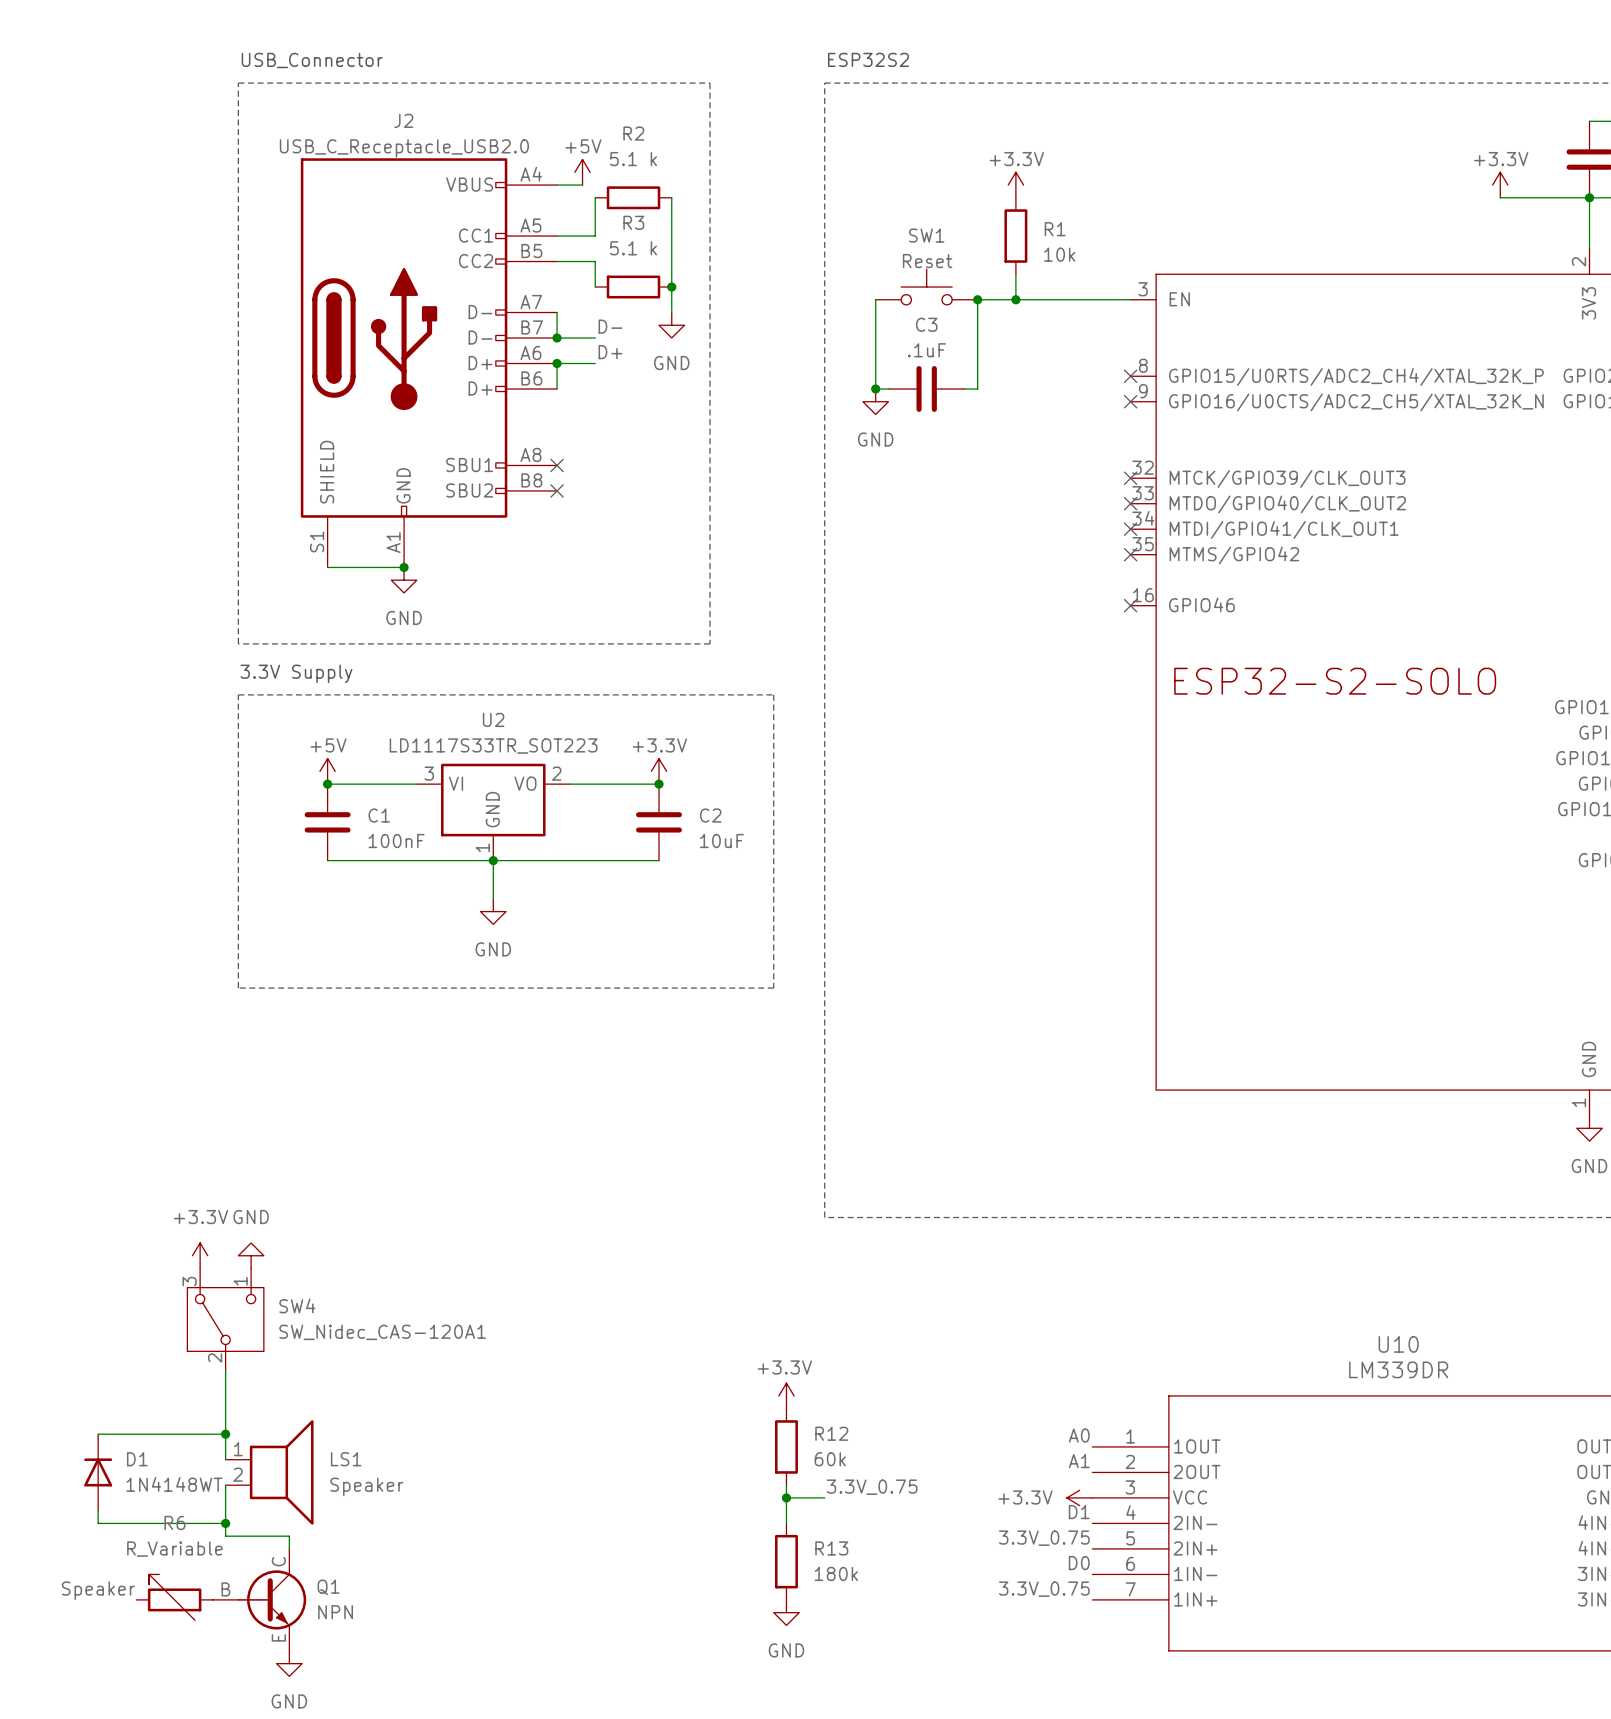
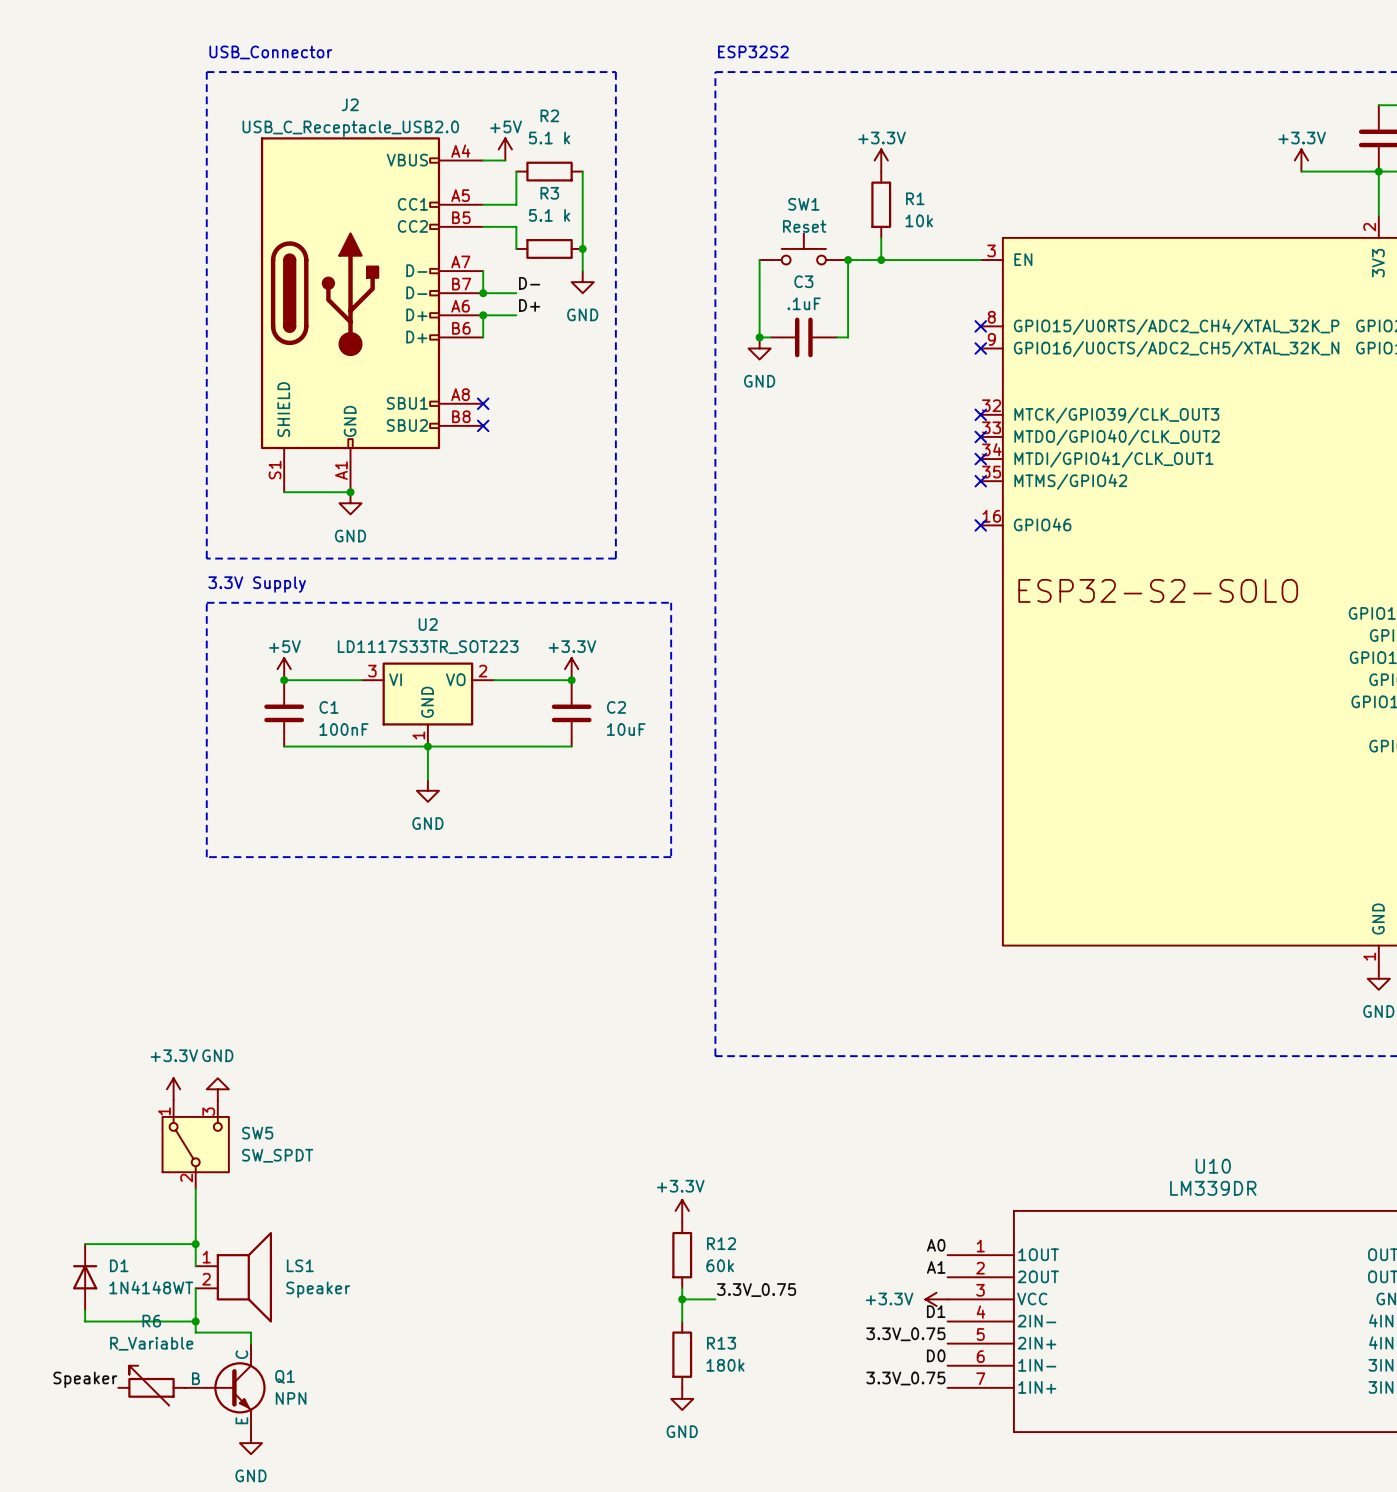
SW4 pin number: 3 (189, 1281) -> 1 (164, 1111)
SW4 pin number: 1 (240, 1281) -> 3 (208, 1111)
SW4 name: SW4 (297, 1305) -> SW5 (257, 1133)
SW4 value: SW_Nidec_CAS-120A1 (382, 1332) -> SW_SPDT (277, 1155)

